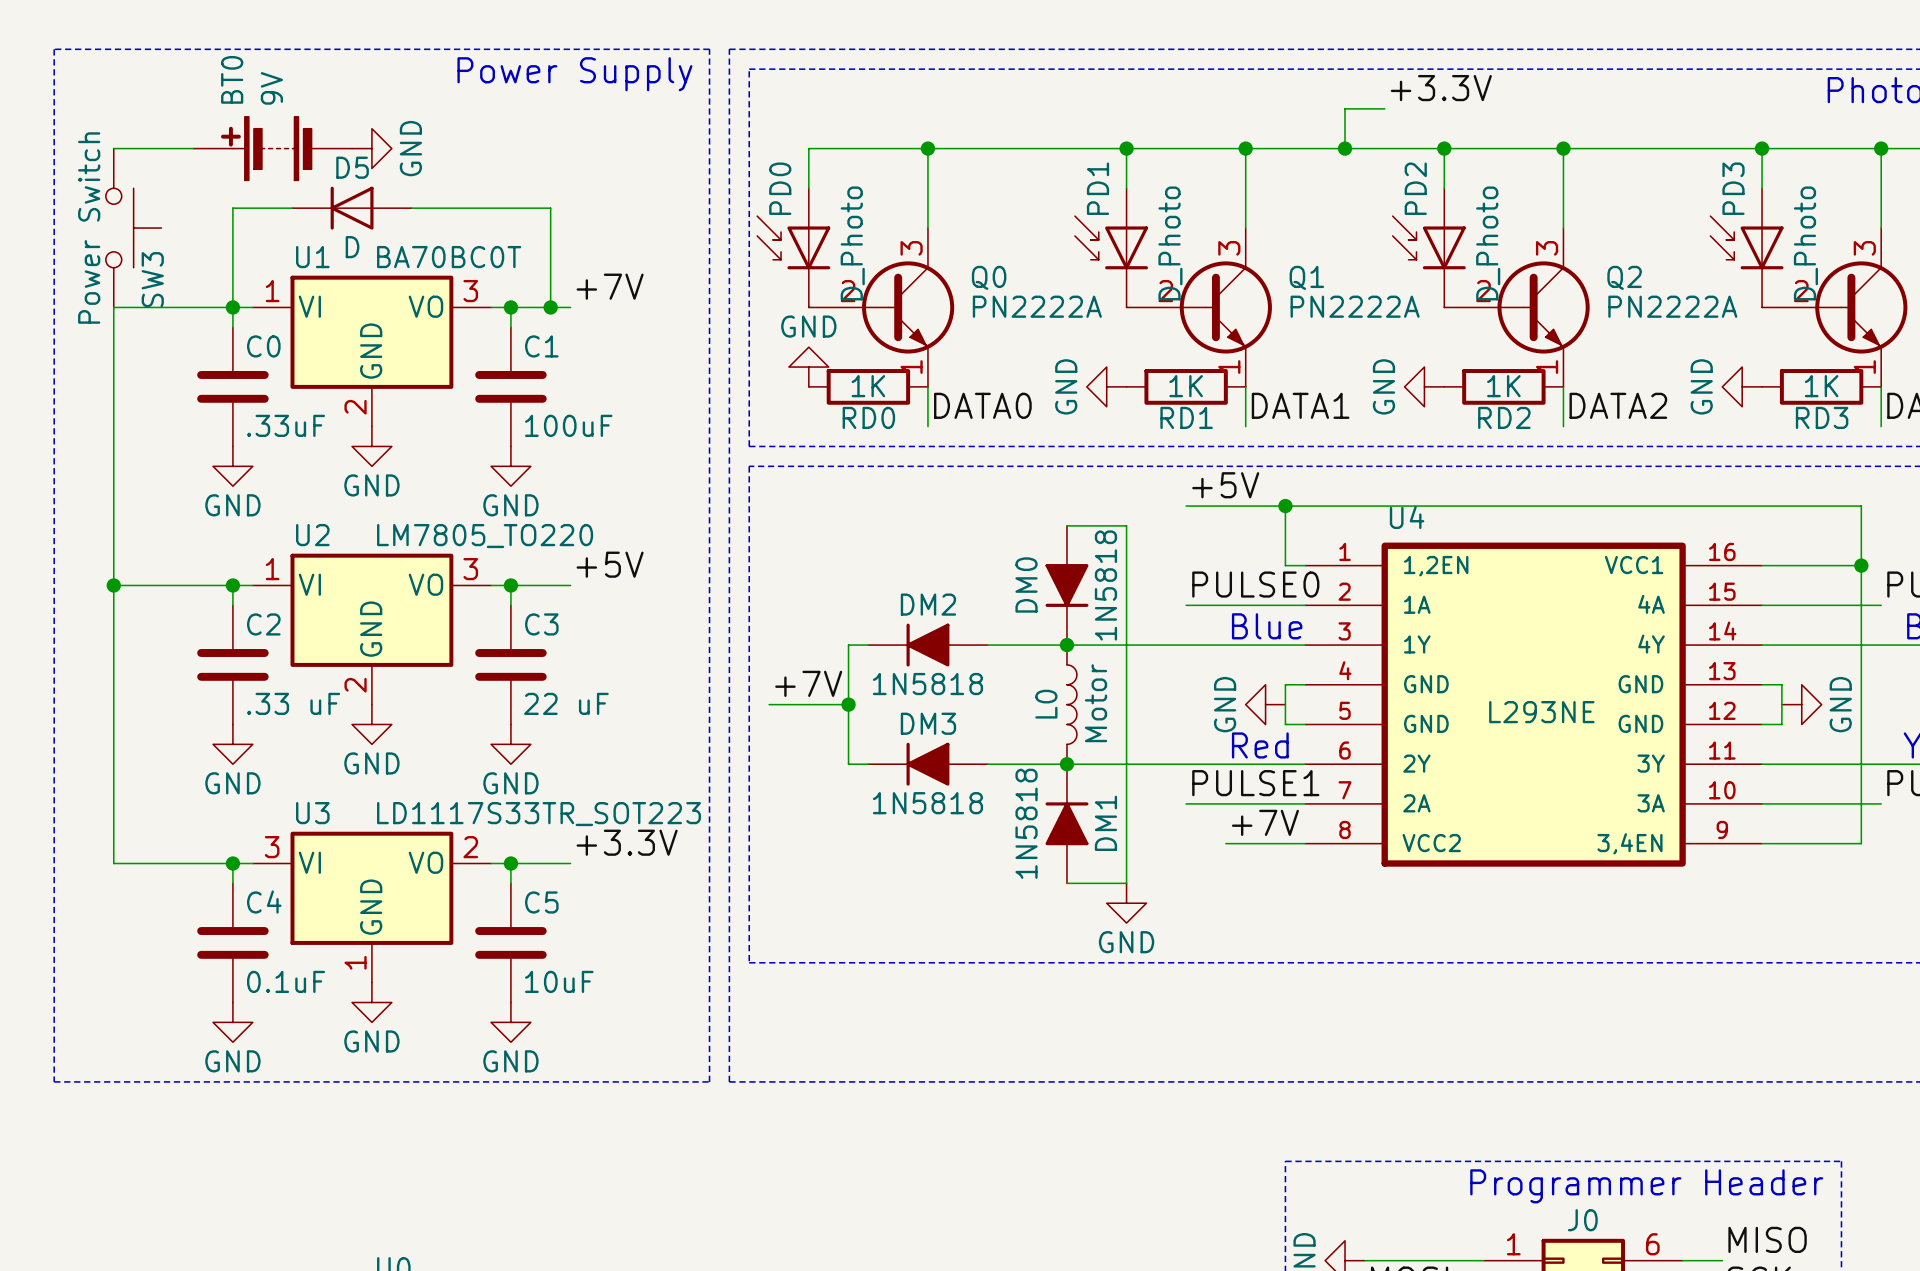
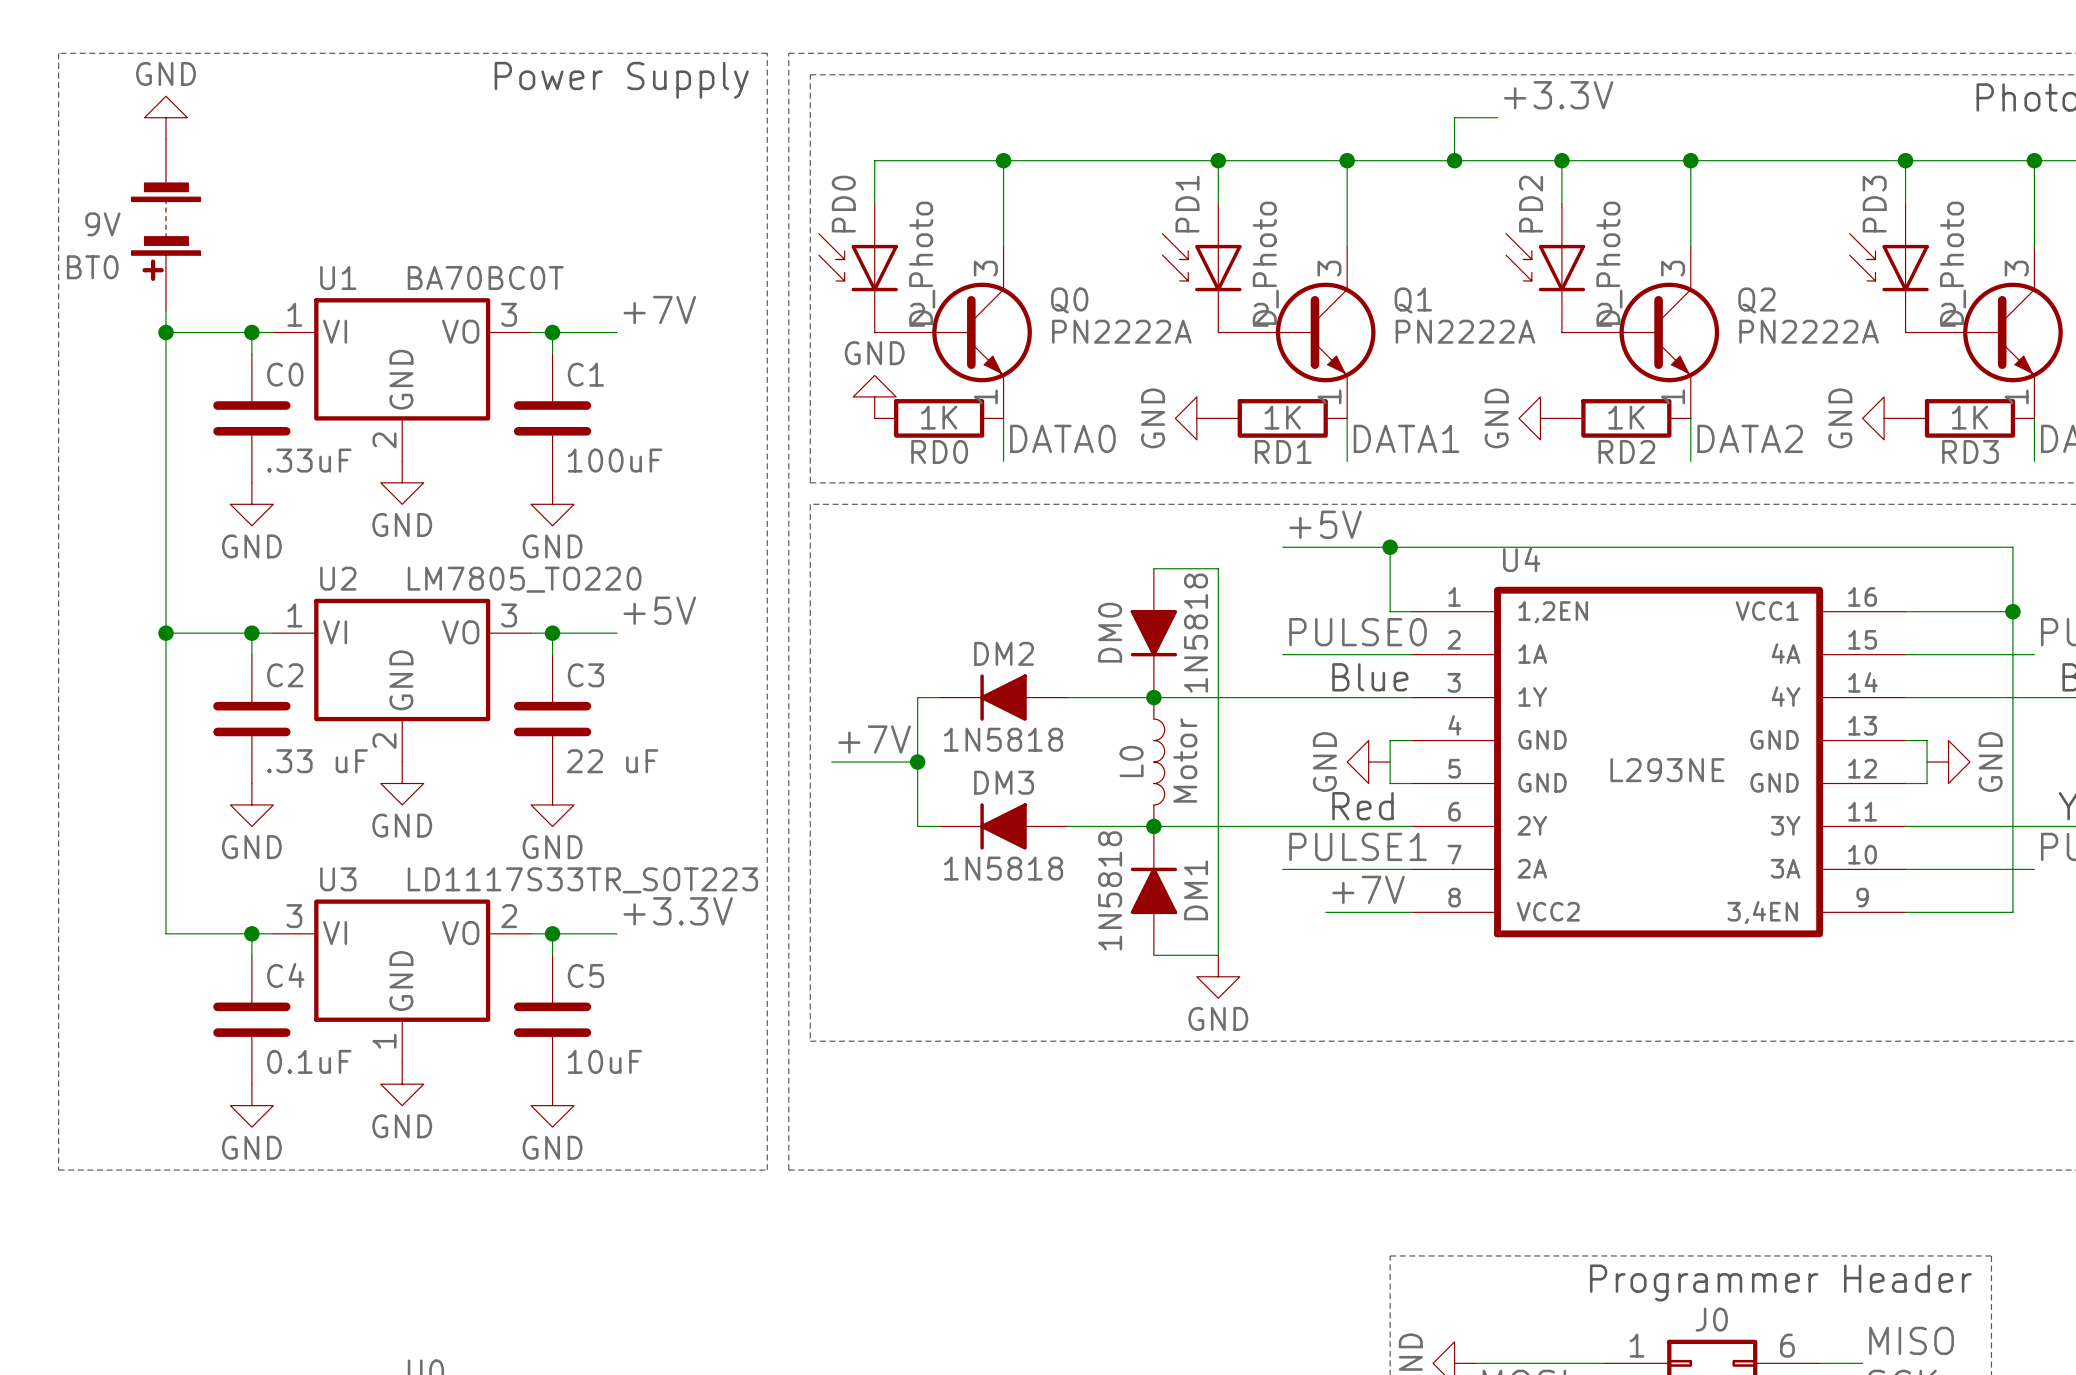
wire: (113, 148) (193, 148) -> none
BT0 rotation: 0° (266, 148) -> 90° counterclockwise (165, 231)
BT0 position: (272, 148) -> (165, 225)
power symbol rotation: 0° (371, 148) -> 90° counterclockwise (165, 117)
power symbol position: GND (371, 148) -> GND (165, 117)
wire: (292, 208) (232, 208) (232, 307) -> none
D5: D (352, 208) -> none
wire: (411, 208) (550, 208) (550, 307) -> none
SW3: Power Switch (133, 228) -> none
wire: (153, 307) (113, 307) (113, 863) (153, 863) -> (165, 311) (165, 933)
junction: none -> (165, 332)
junction: (550, 307) -> none
wire: (113, 585) (153, 585) -> none
junction position: (113, 585) -> (165, 633)

